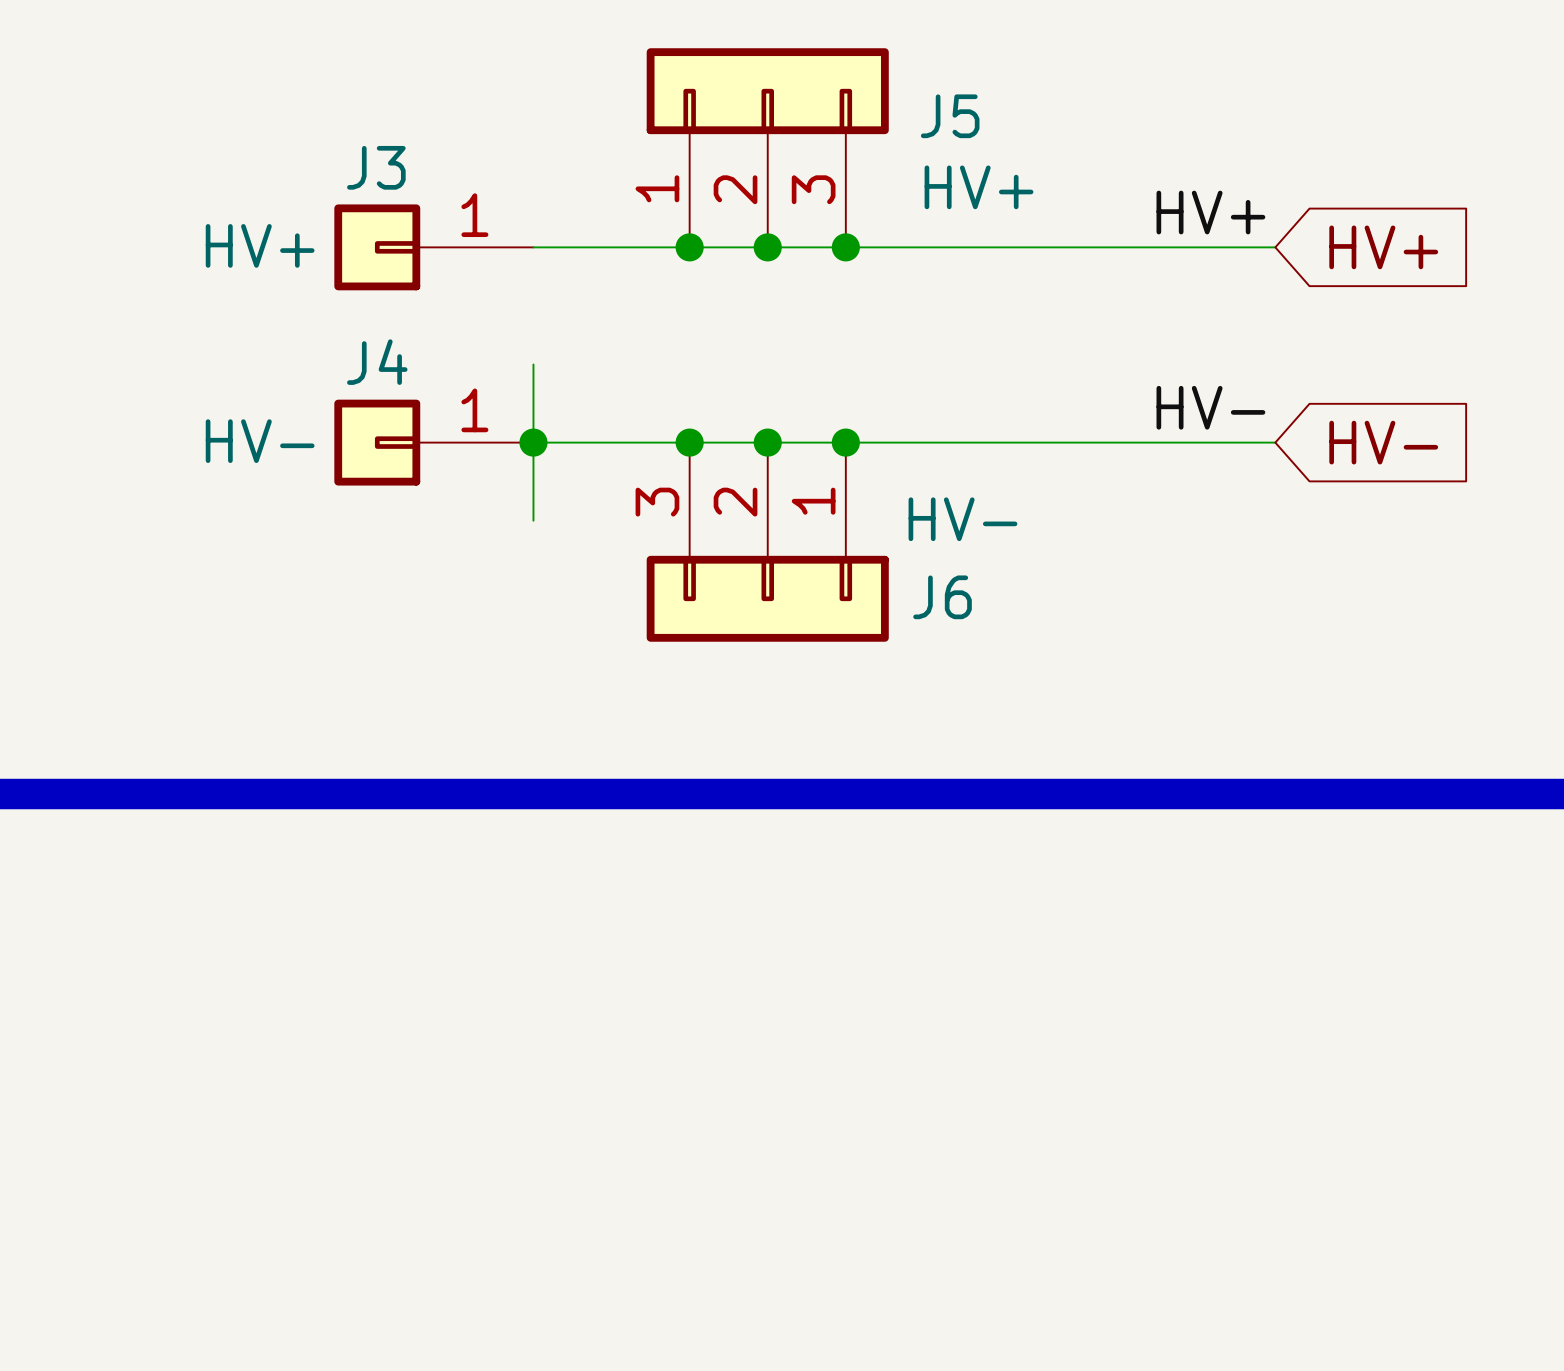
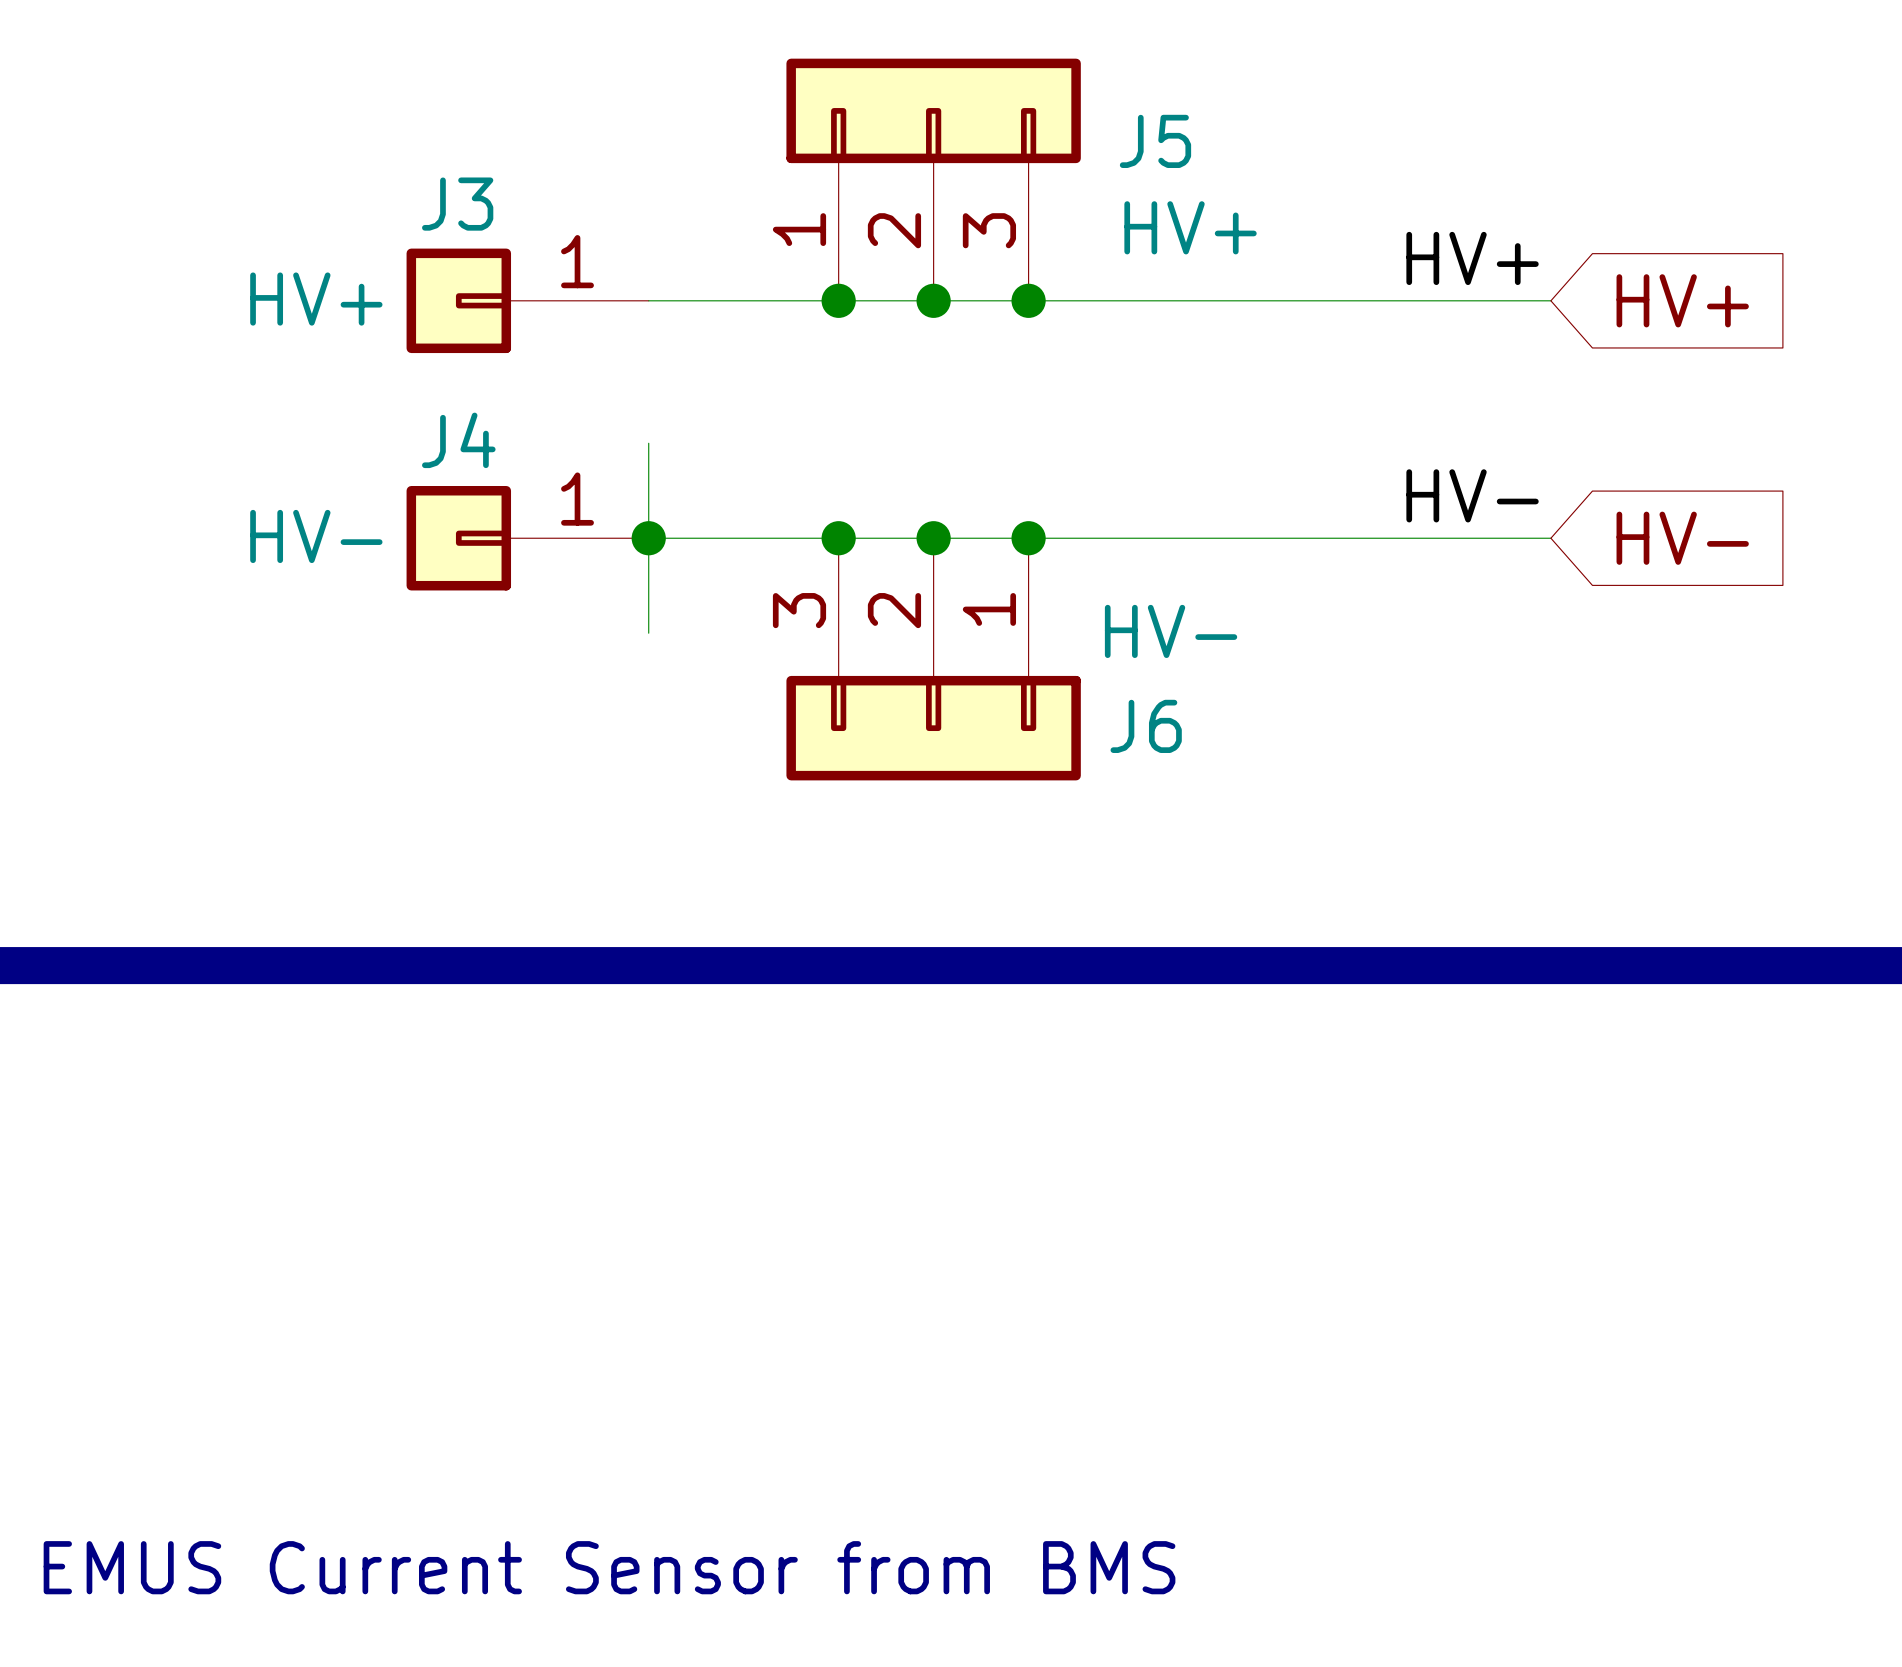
text: none -> EMUS Current Sensor from BMS (609, 1567)

